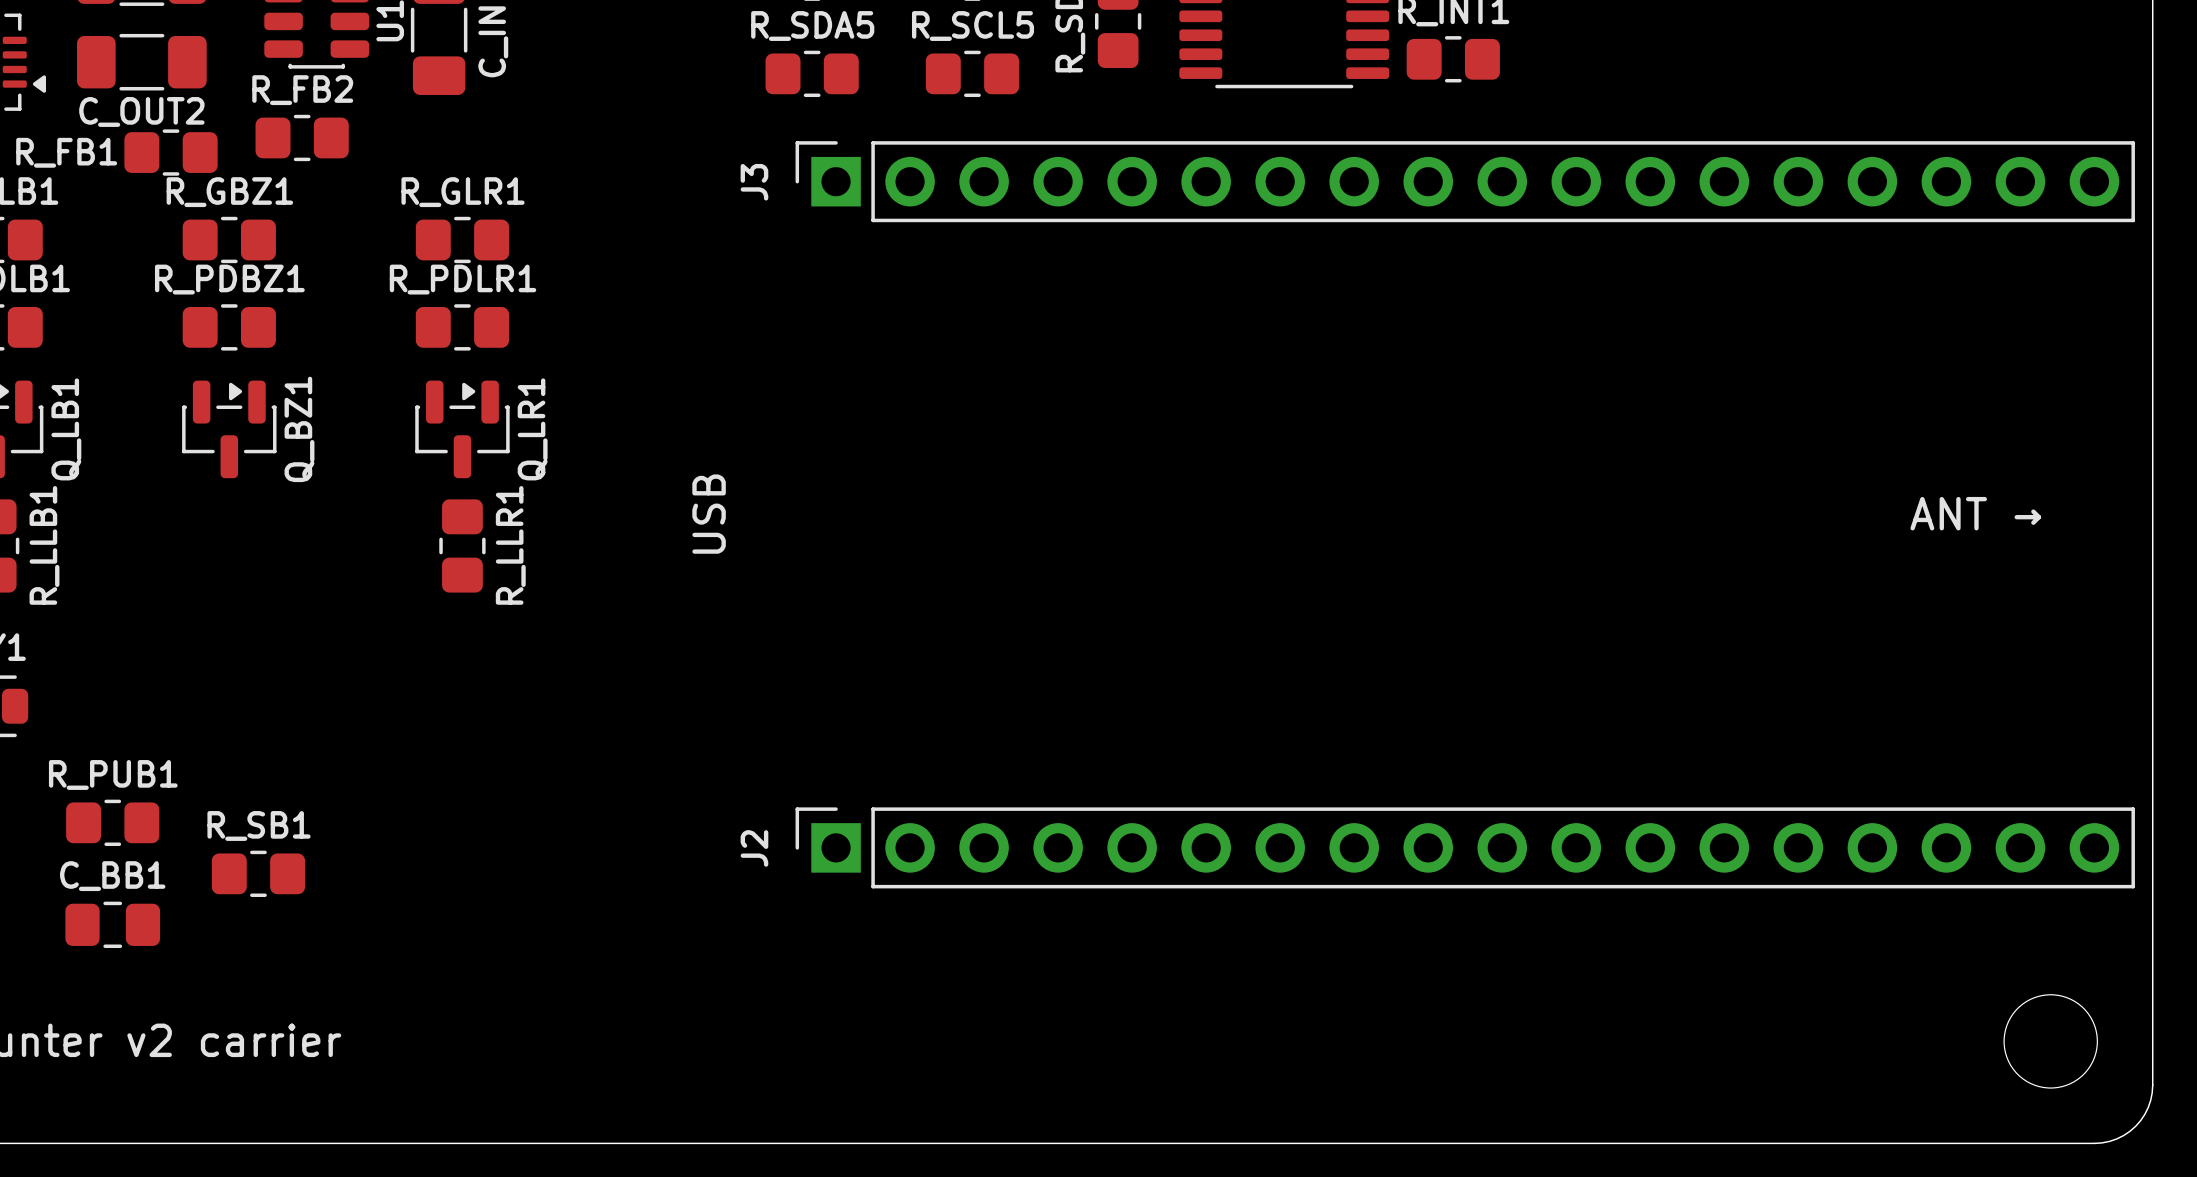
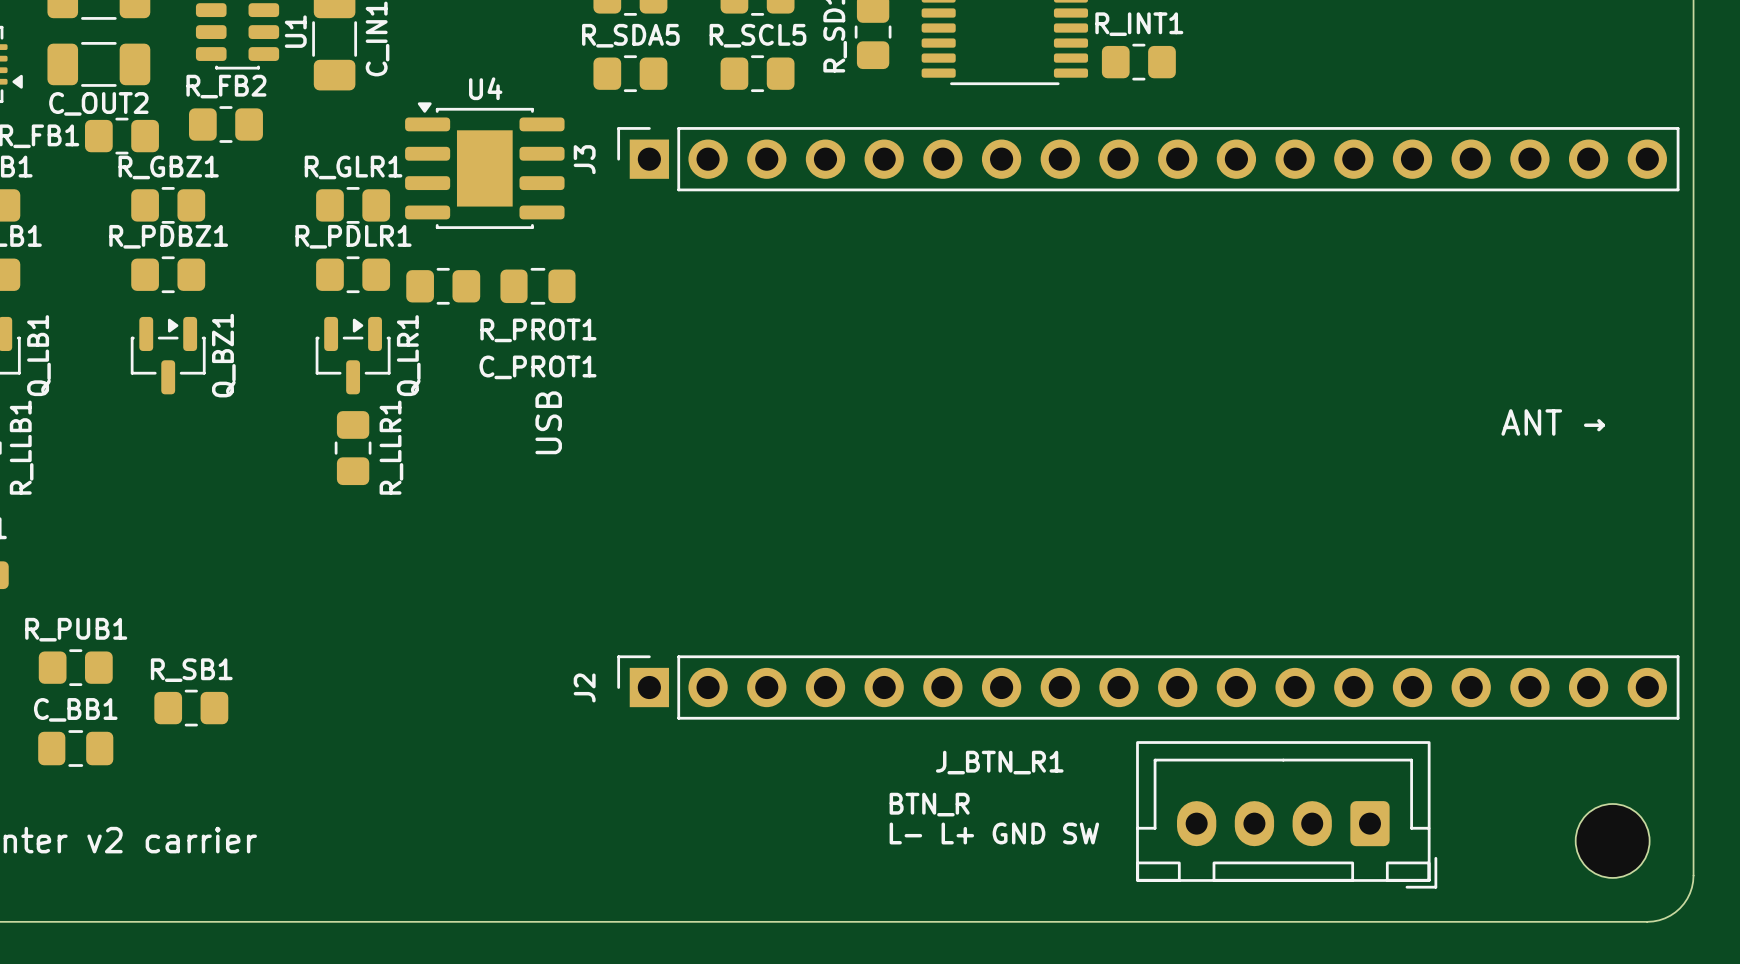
U4: none -> (484, 165)
R_PROT1: none -> (443, 286)
C_PROT1: none -> (537, 286)
text: none -> BTN_R (929, 804)
J_BTN_R1: none -> (1286, 814)
text: none -> L- L+ GND SW (994, 833)

